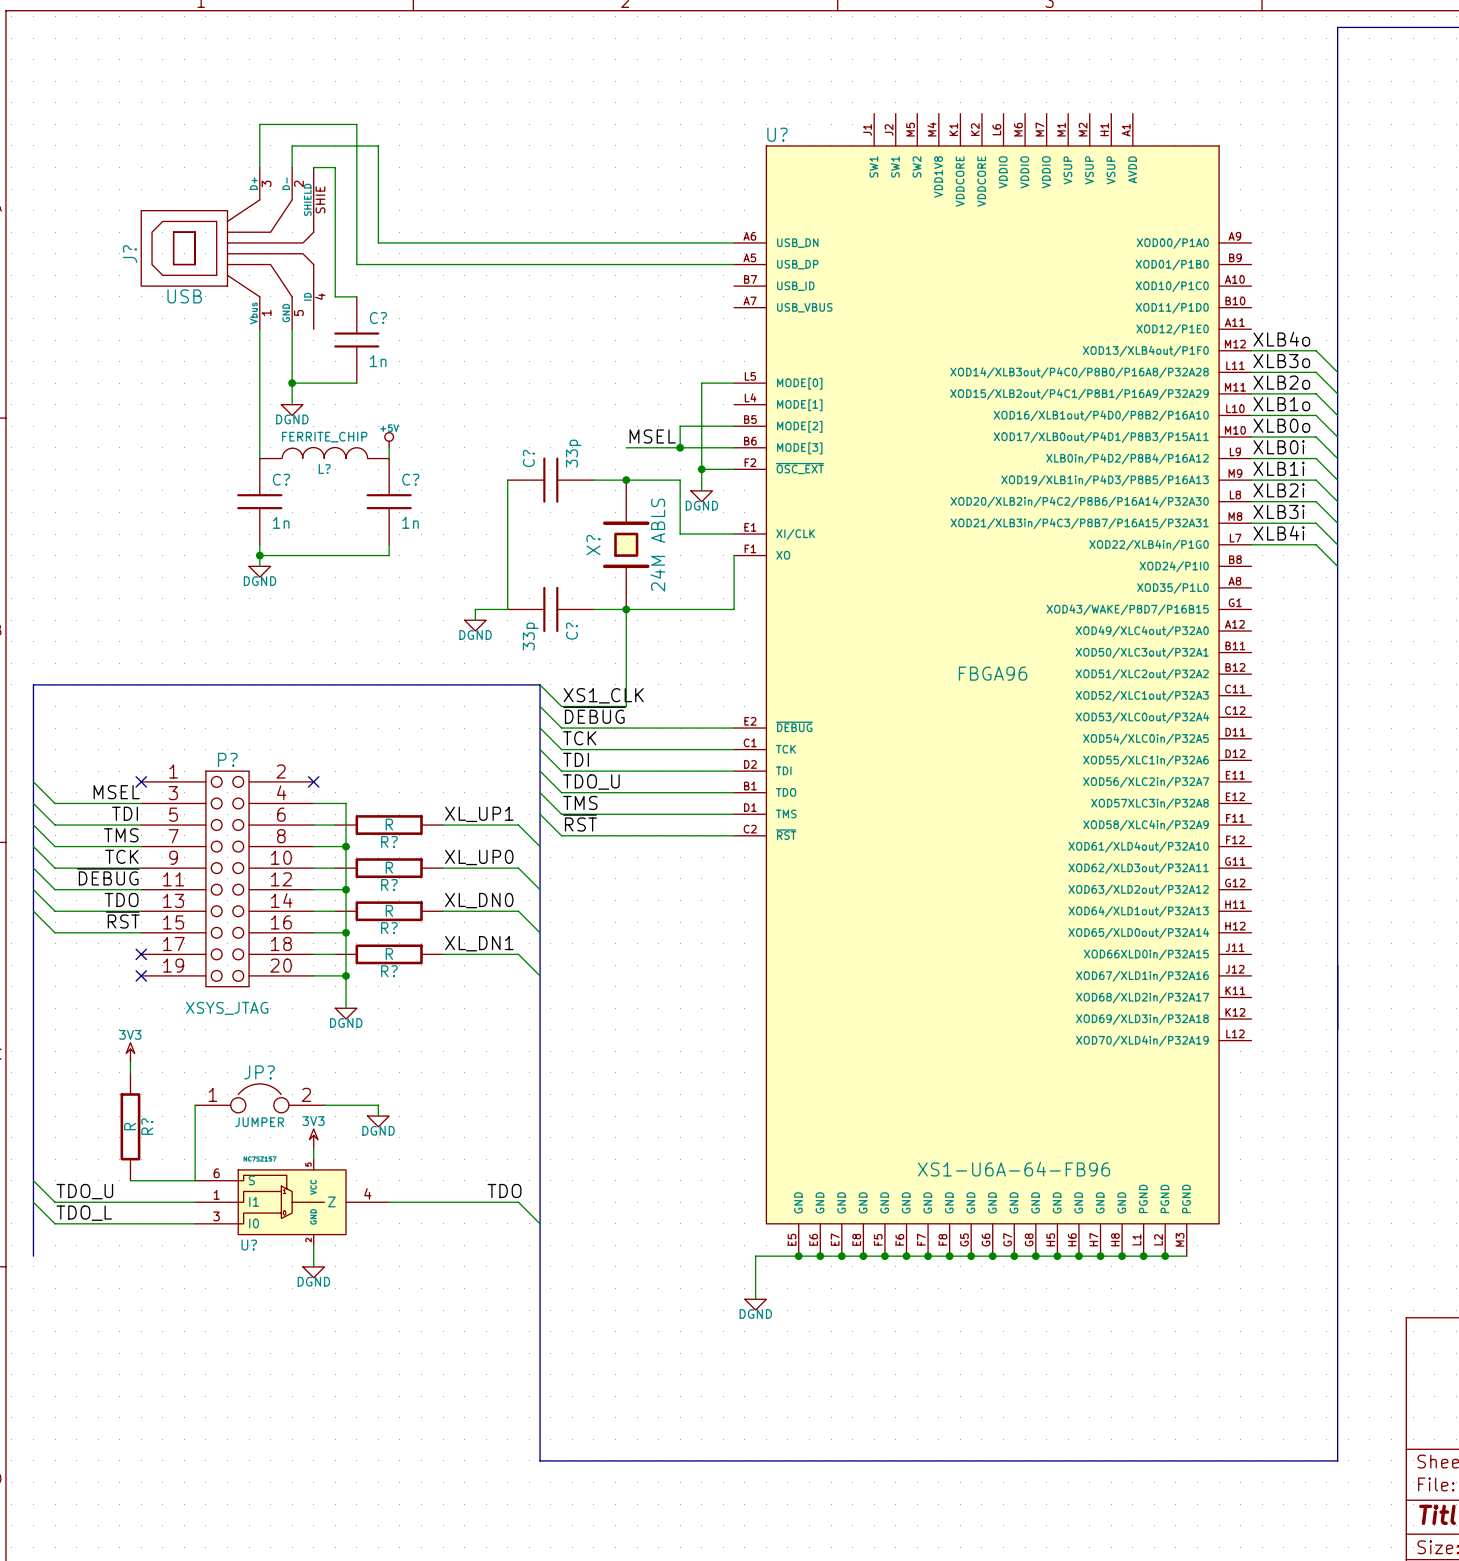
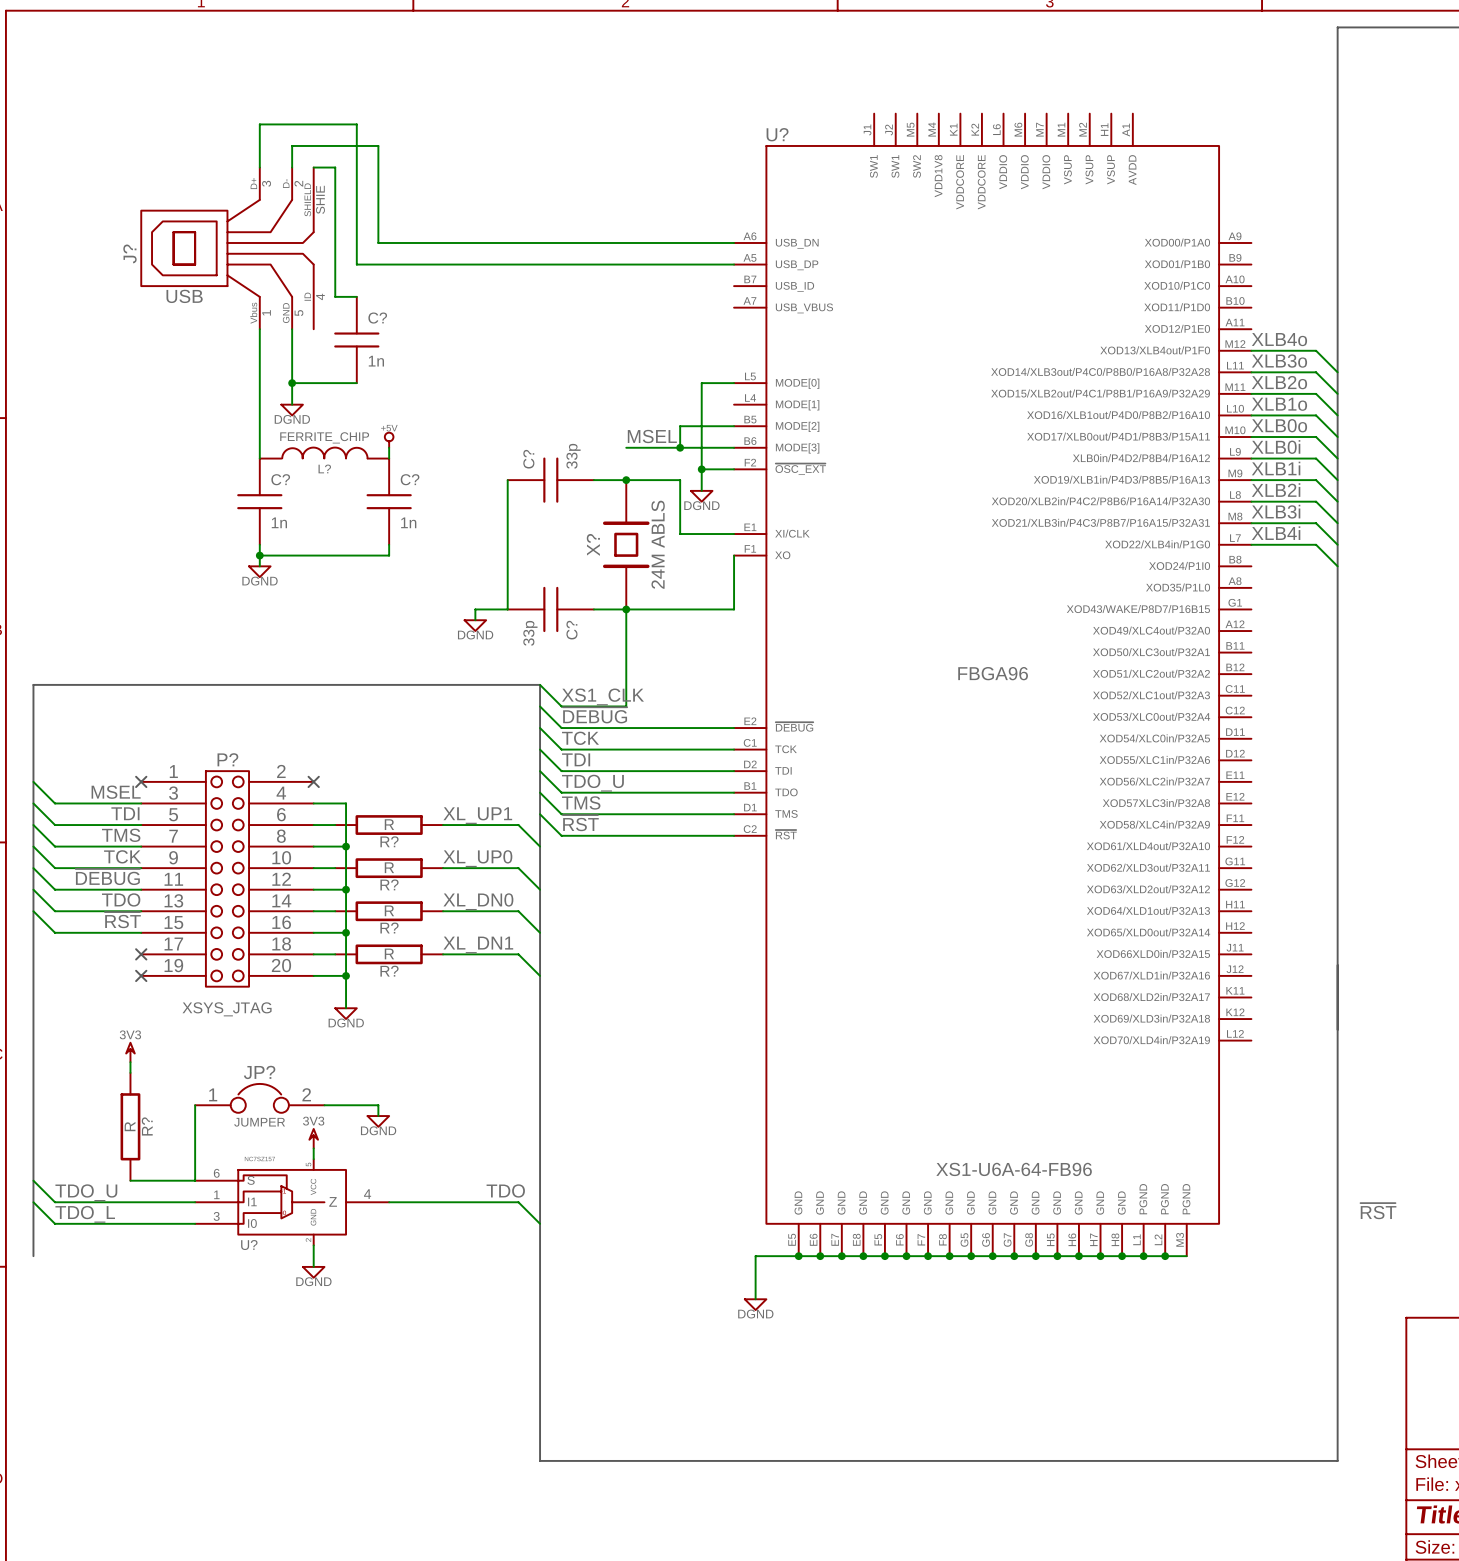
label: none -> ~{RST} (1378, 1211)

